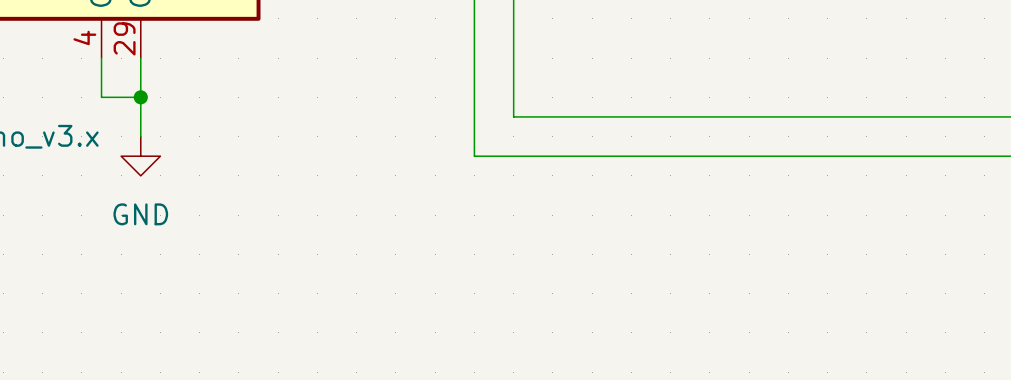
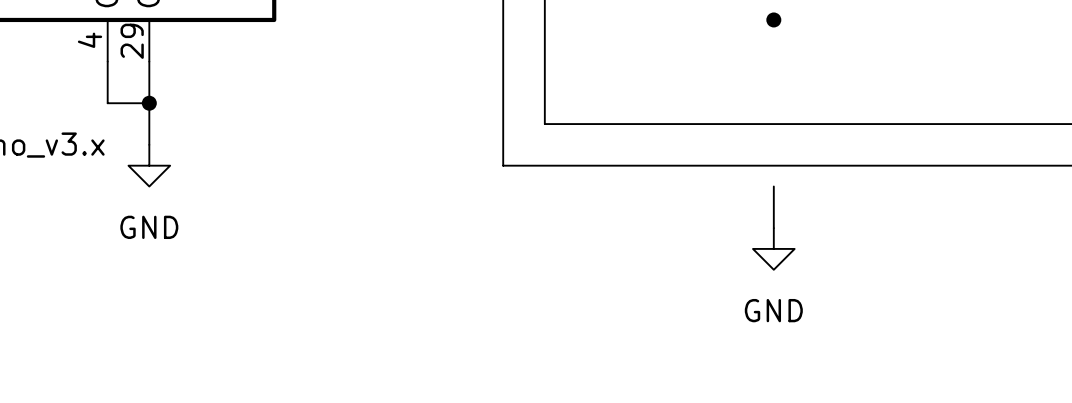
junction: none -> (773, 19)
wire: none -> (773, 186) (773, 228)
power symbol: none -> GND (773, 248)

